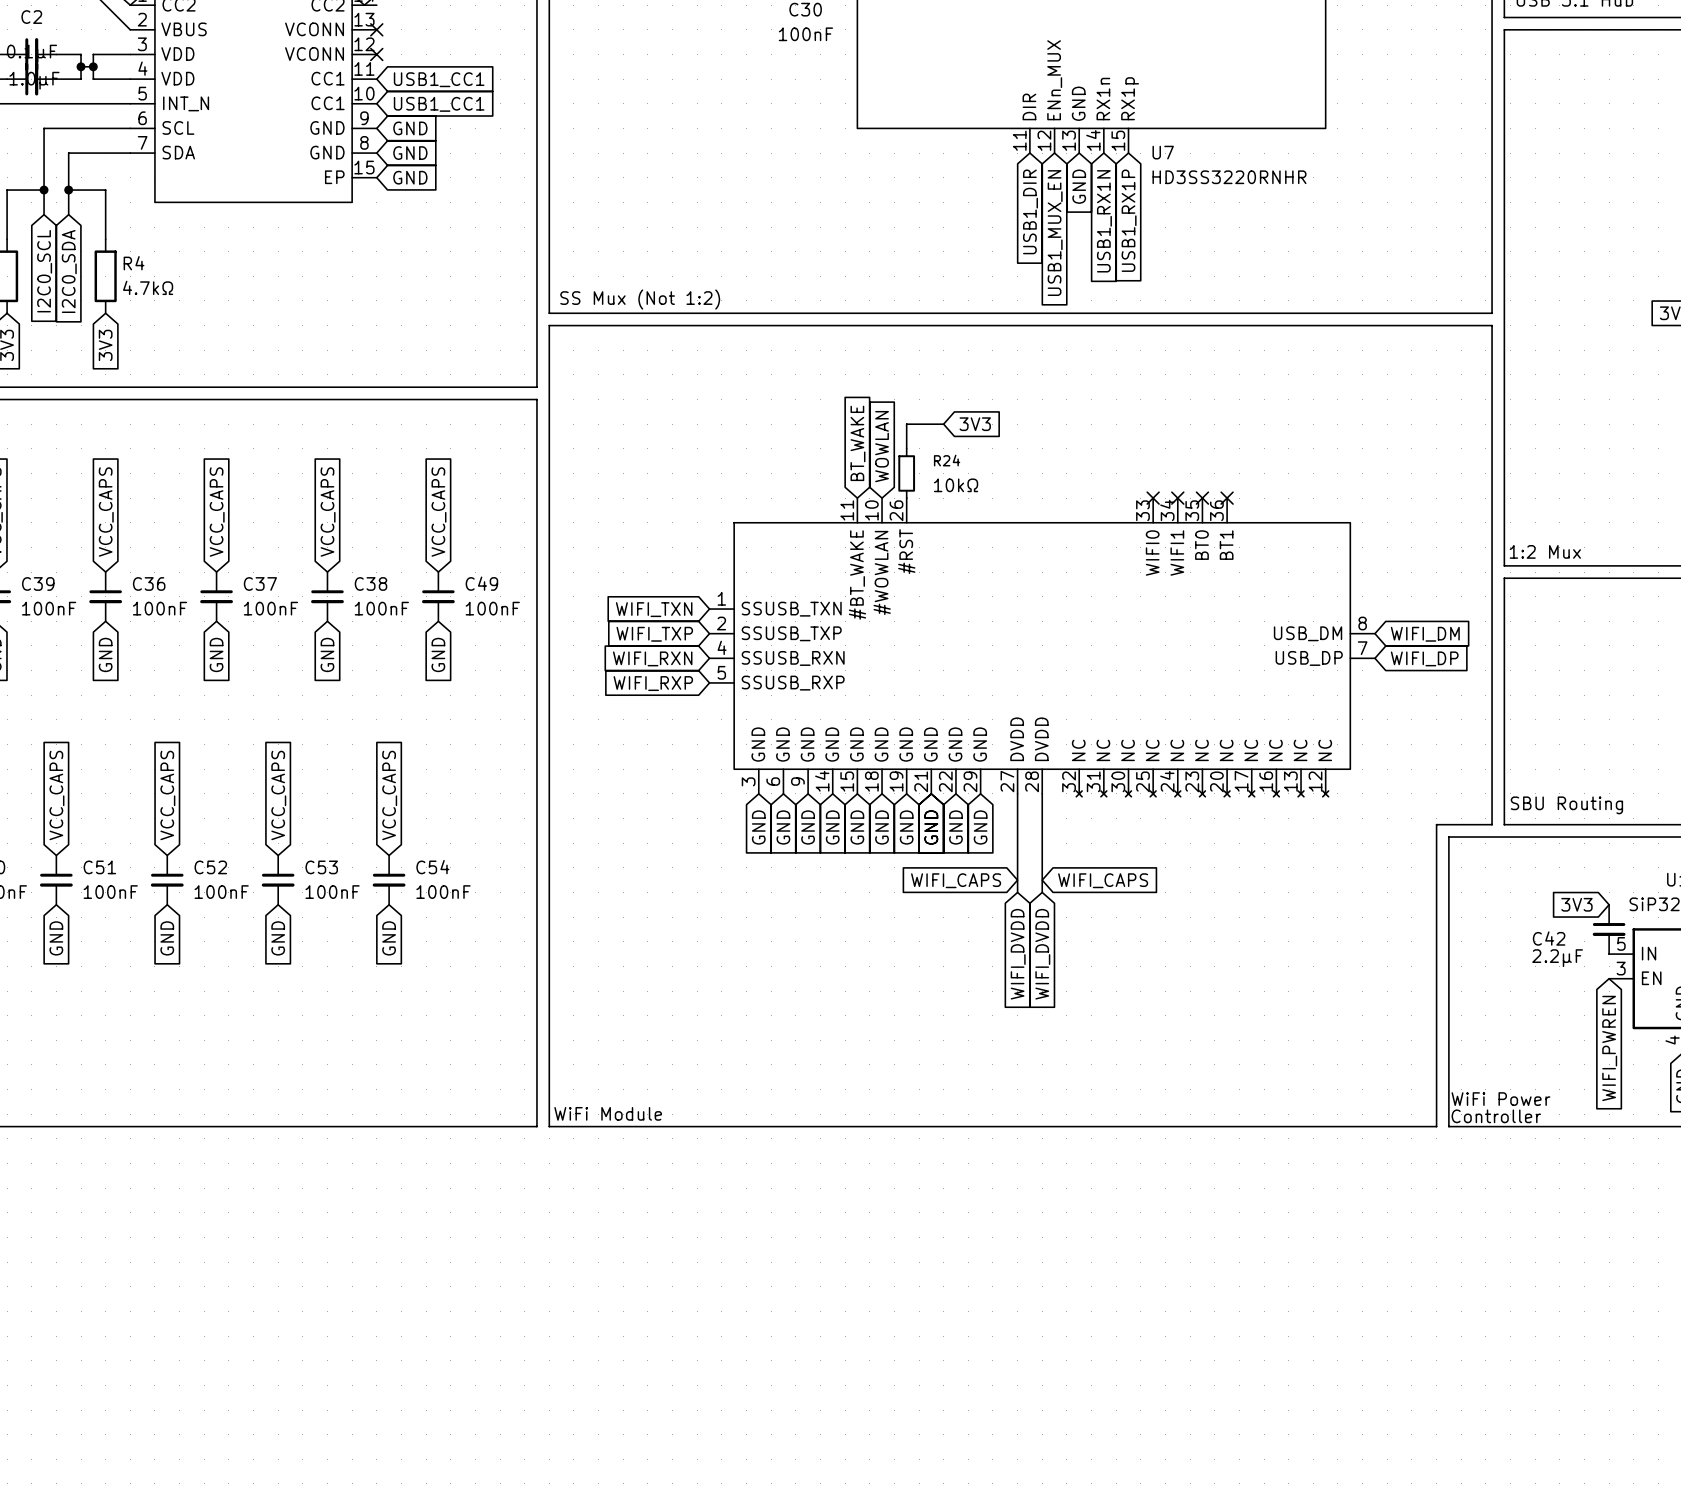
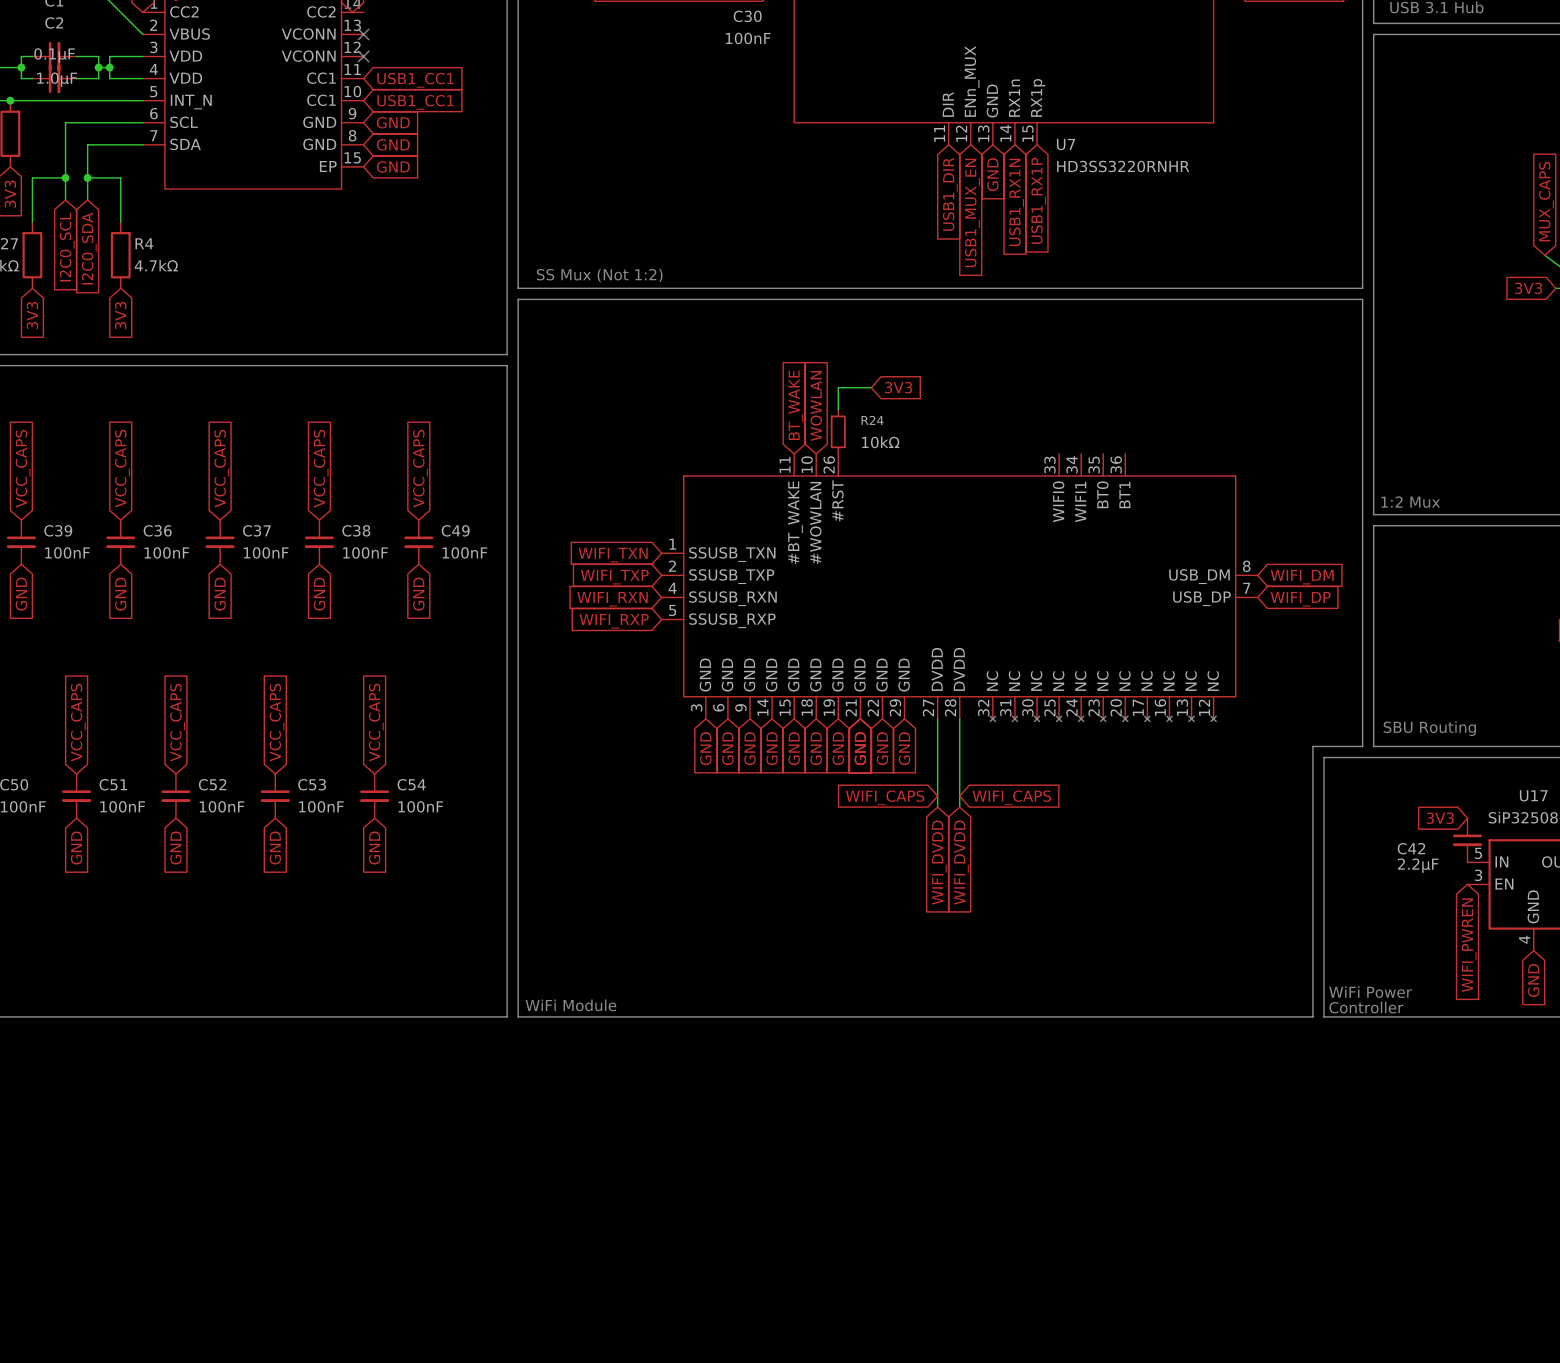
no-connect mark: (1153, 498) -> none
no-connect mark: (1177, 498) -> none
no-connect mark: (1202, 498) -> none
no-connect mark: (1227, 498) -> none

